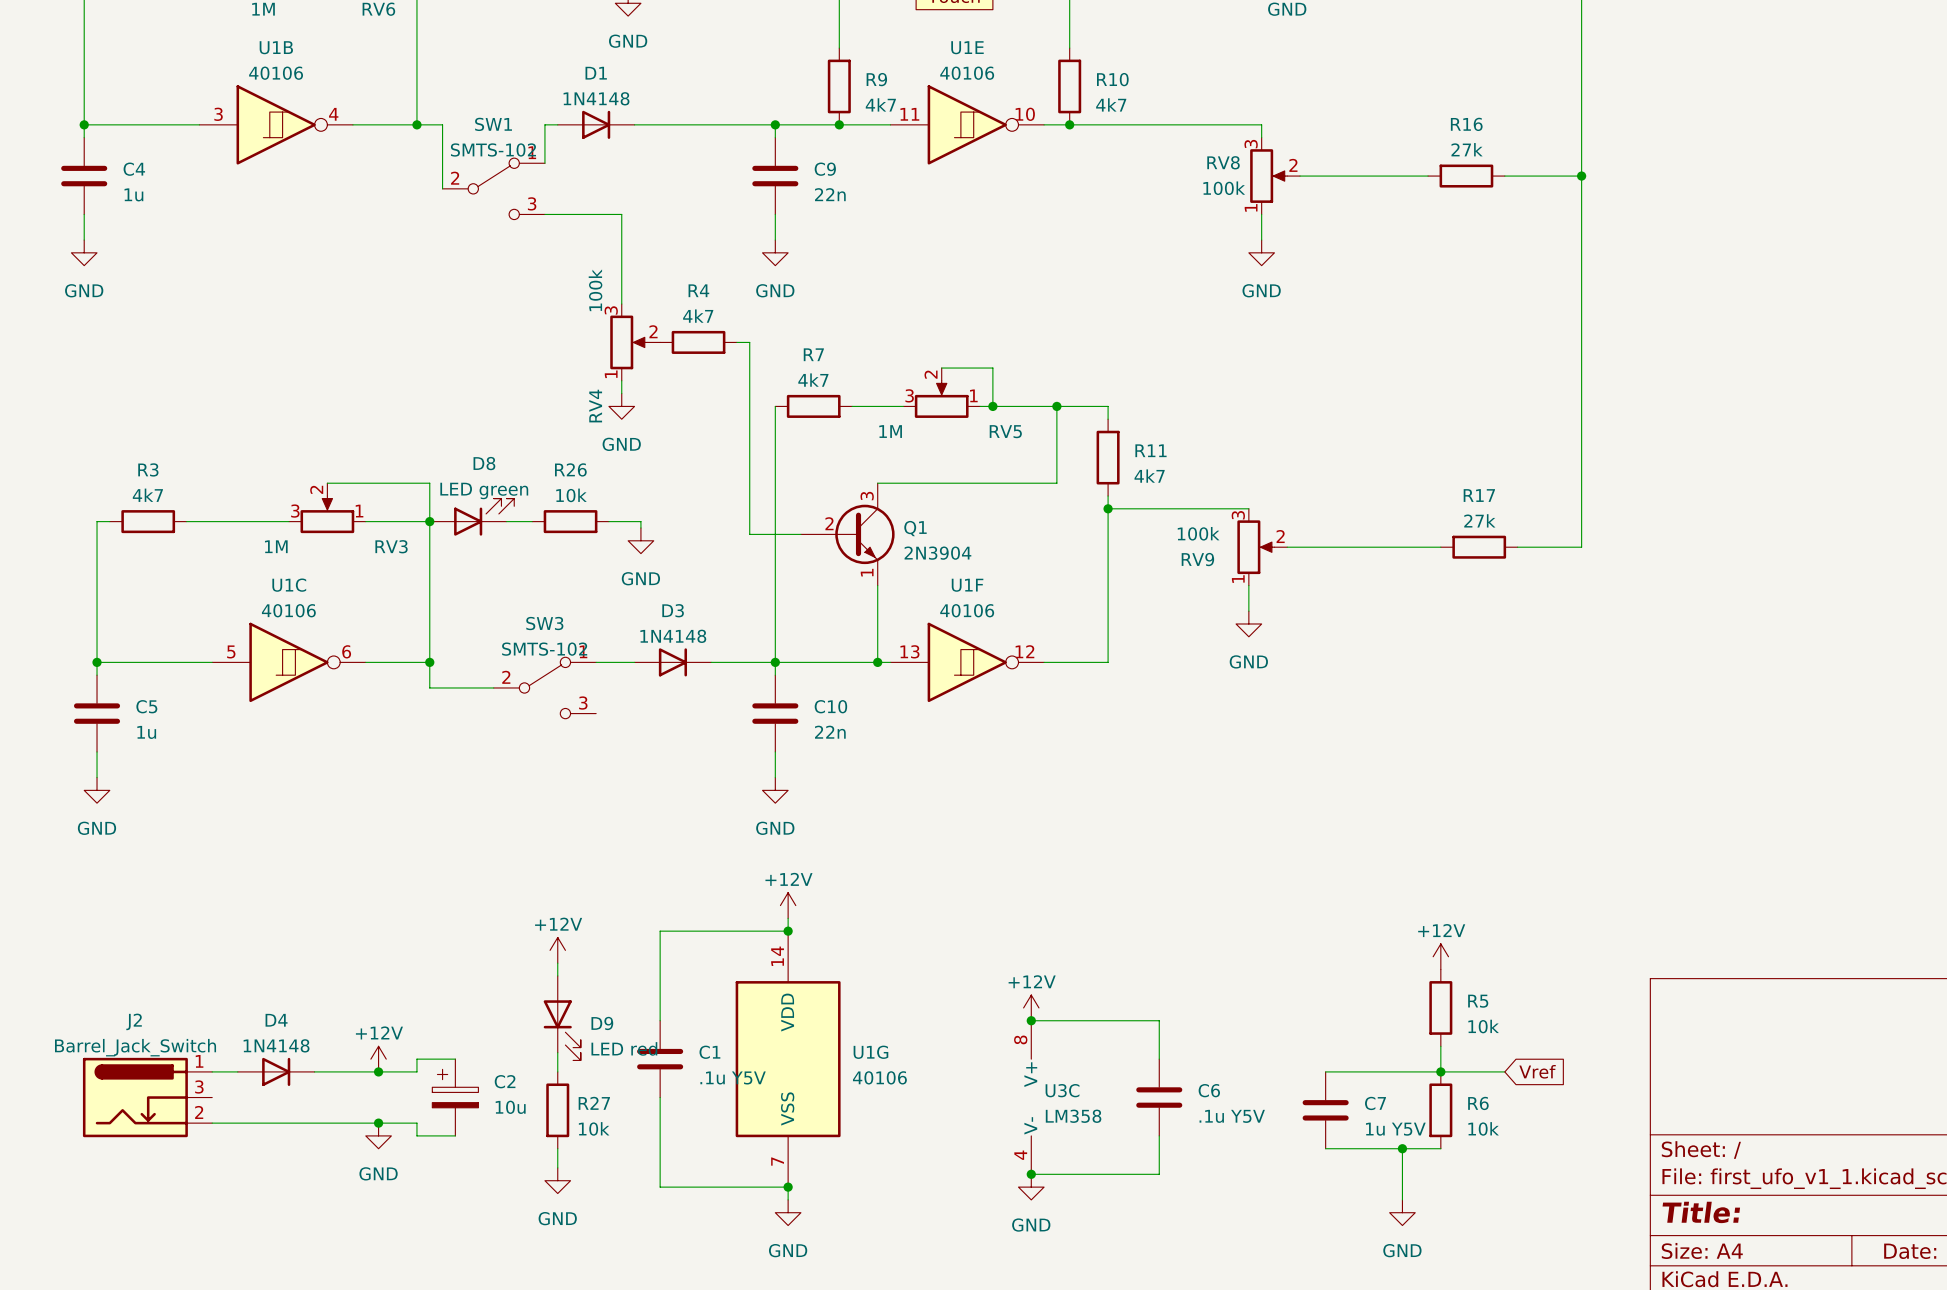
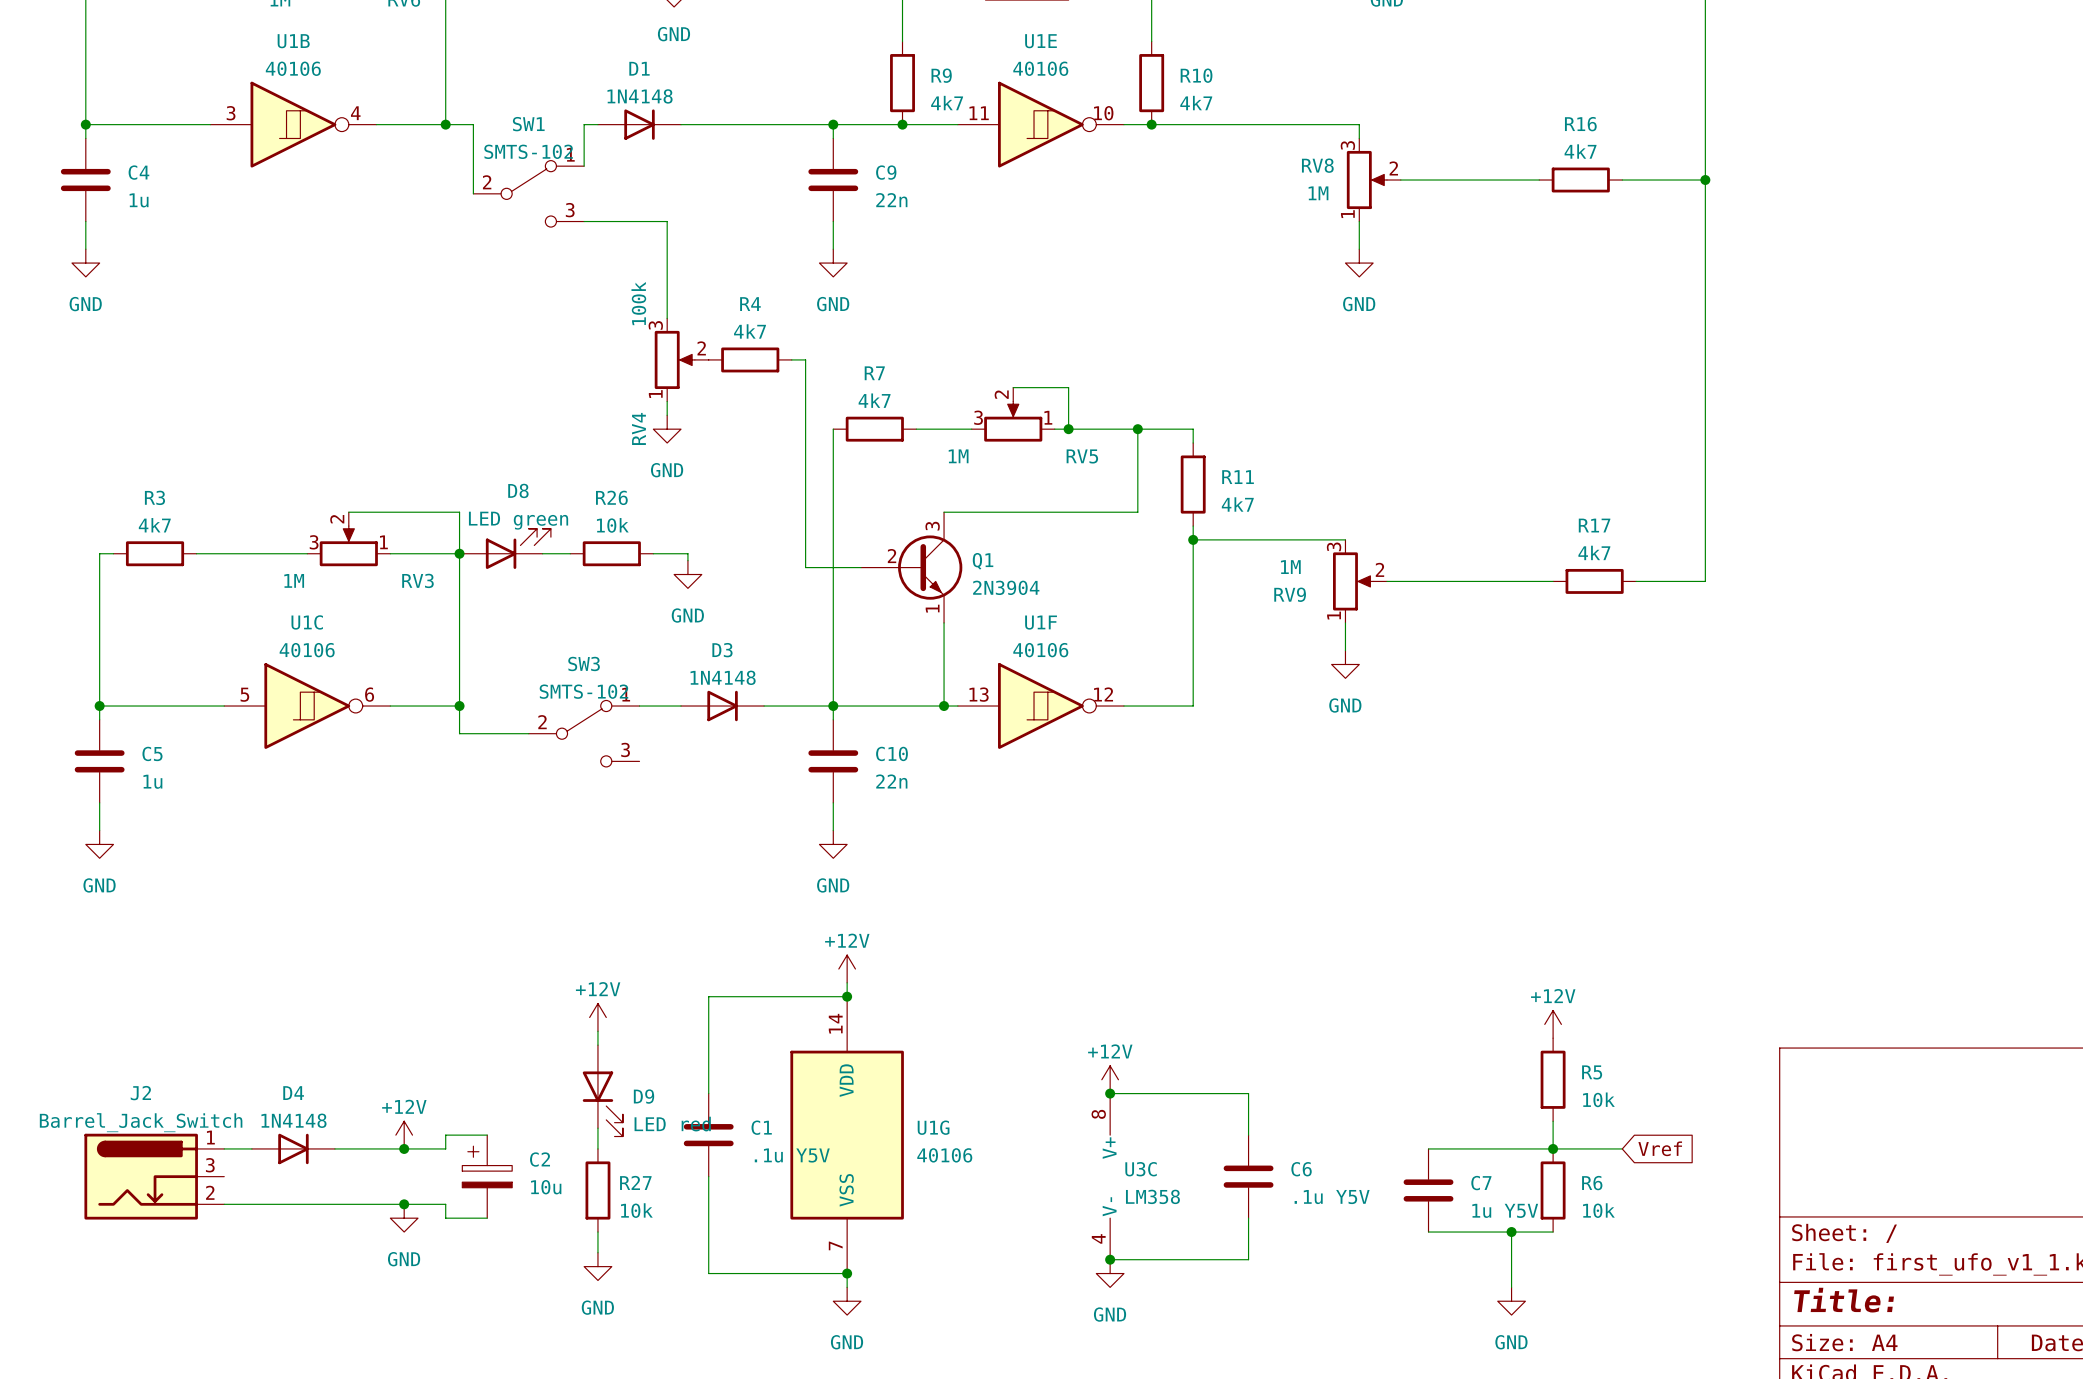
R16 value: 27k (1467, 149) -> 4k7 (1580, 151)
RV8 value: 100k (1224, 188) -> 1M (1318, 193)
R17 value: 27k (1479, 520) -> 4k7 (1594, 552)
RV9 value: 100k (1198, 533) -> 1M (1290, 567)

